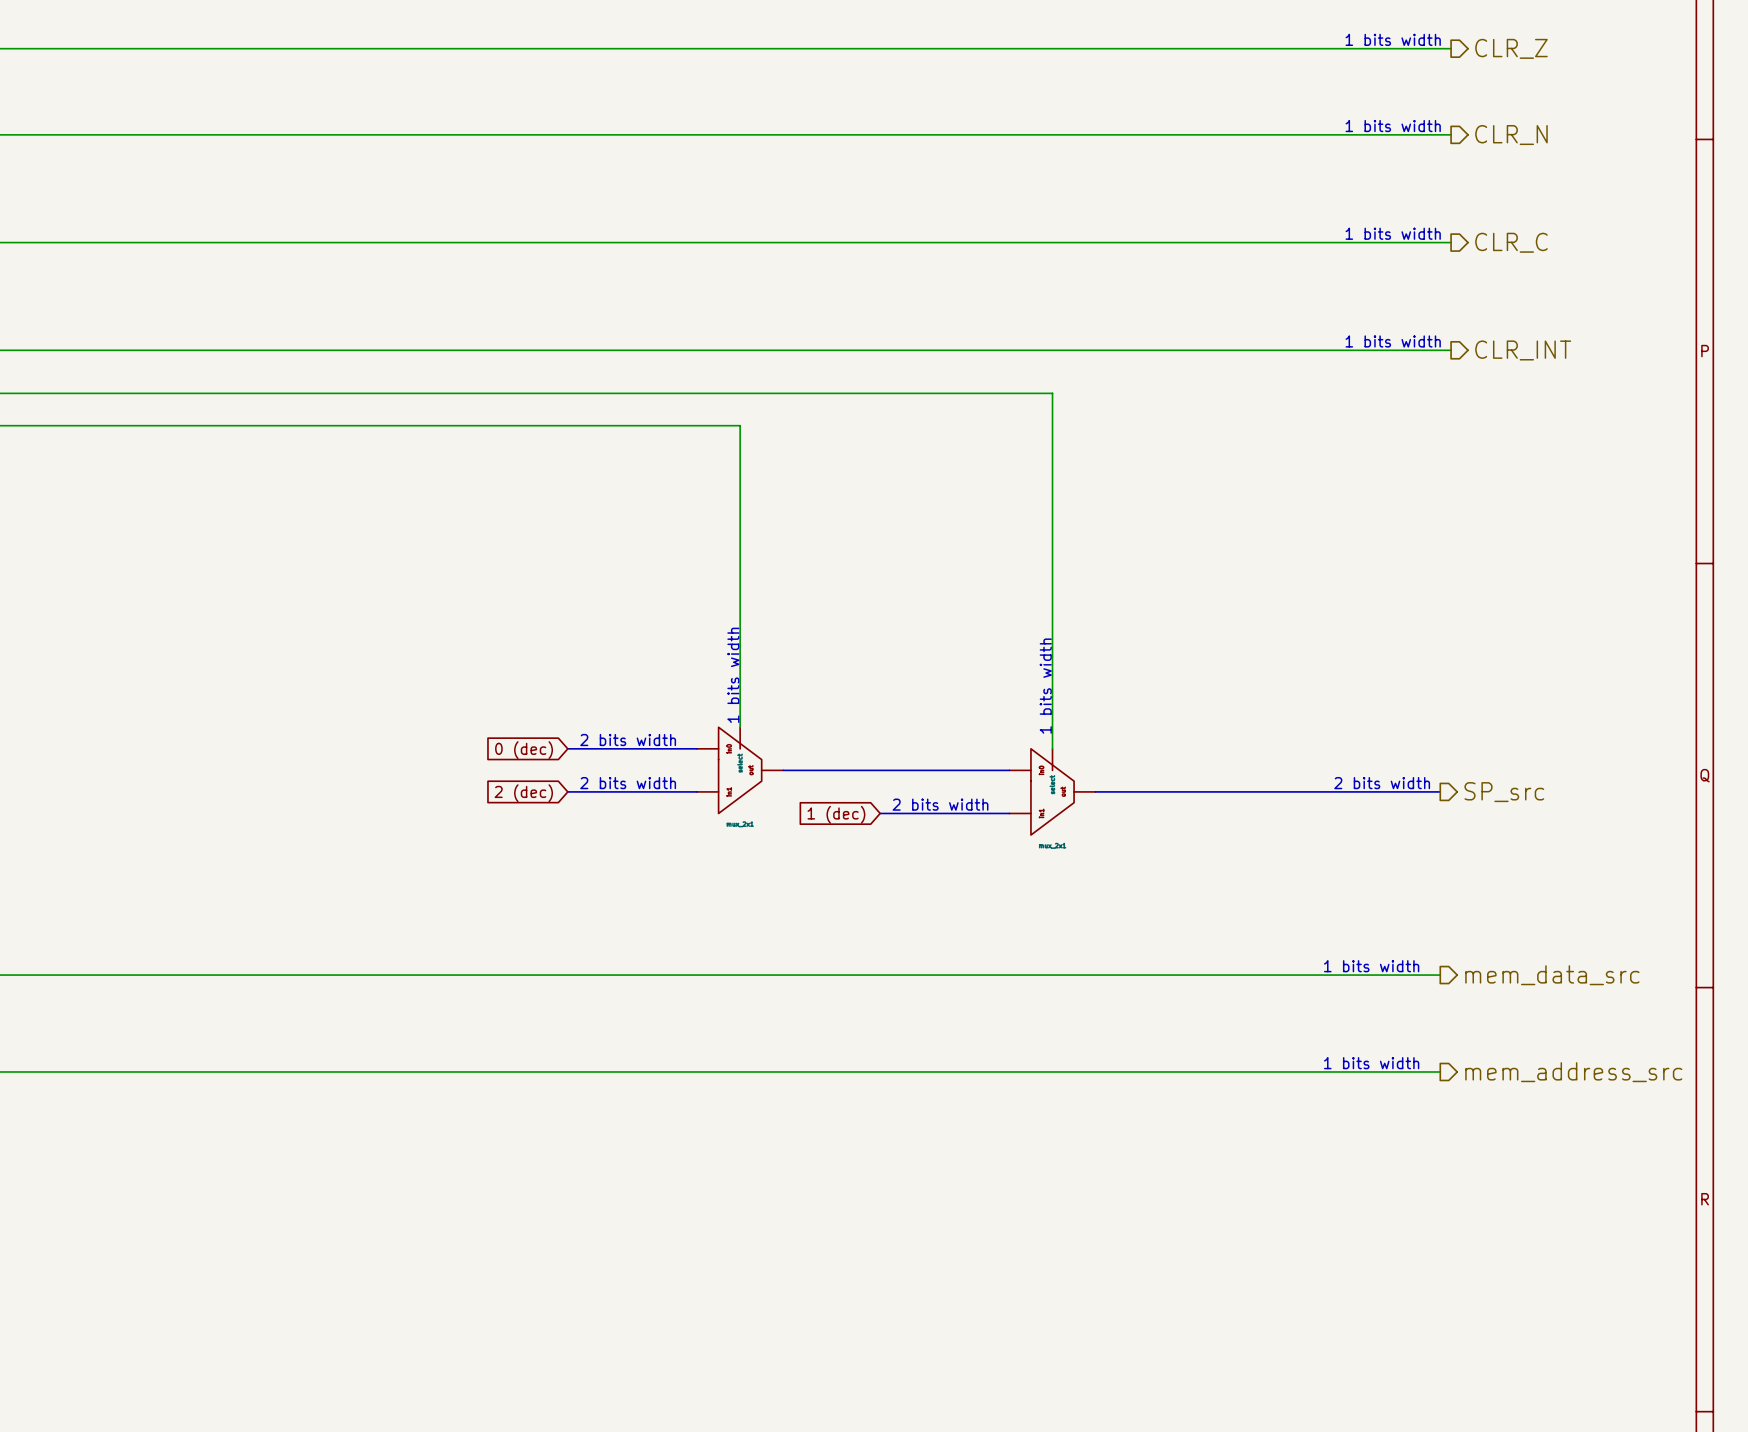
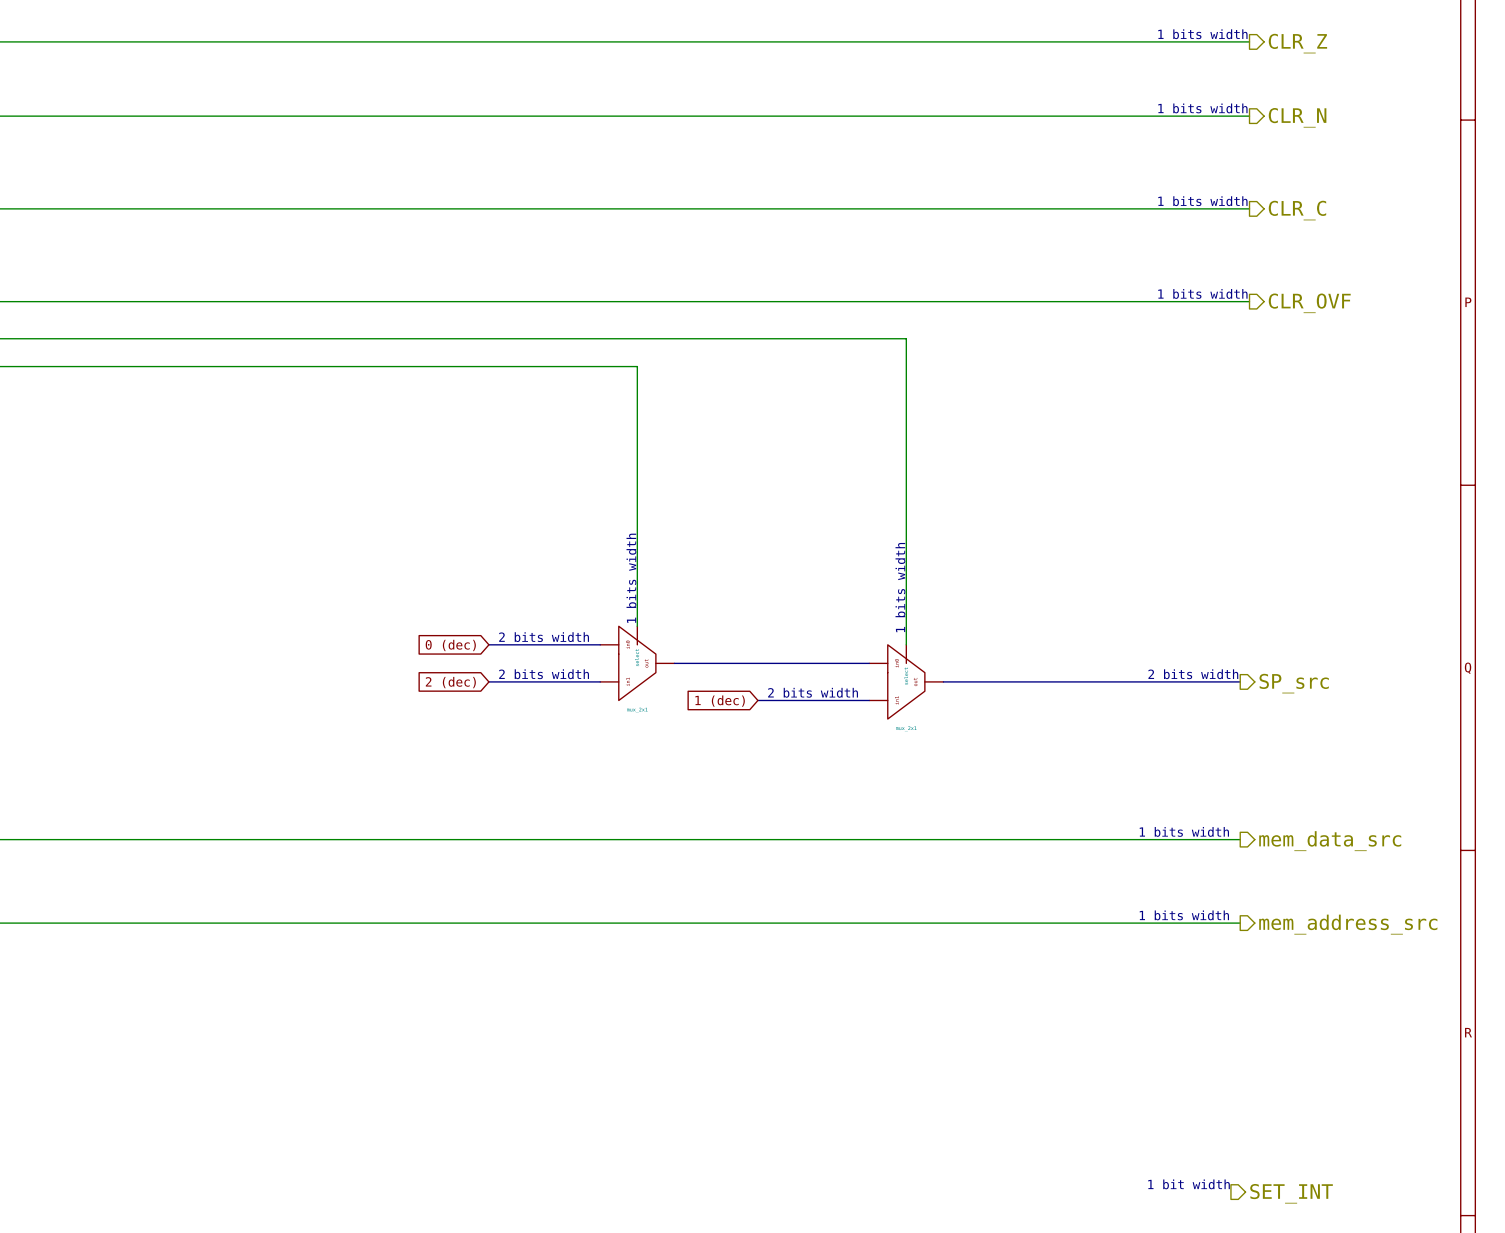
hierarchical label: CLR_INT (1523, 350) -> CLR_OVF (1309, 303)
text: none -> 1 bit width (1189, 1184)
hierarchical label: none -> SET_INT (1291, 1193)

